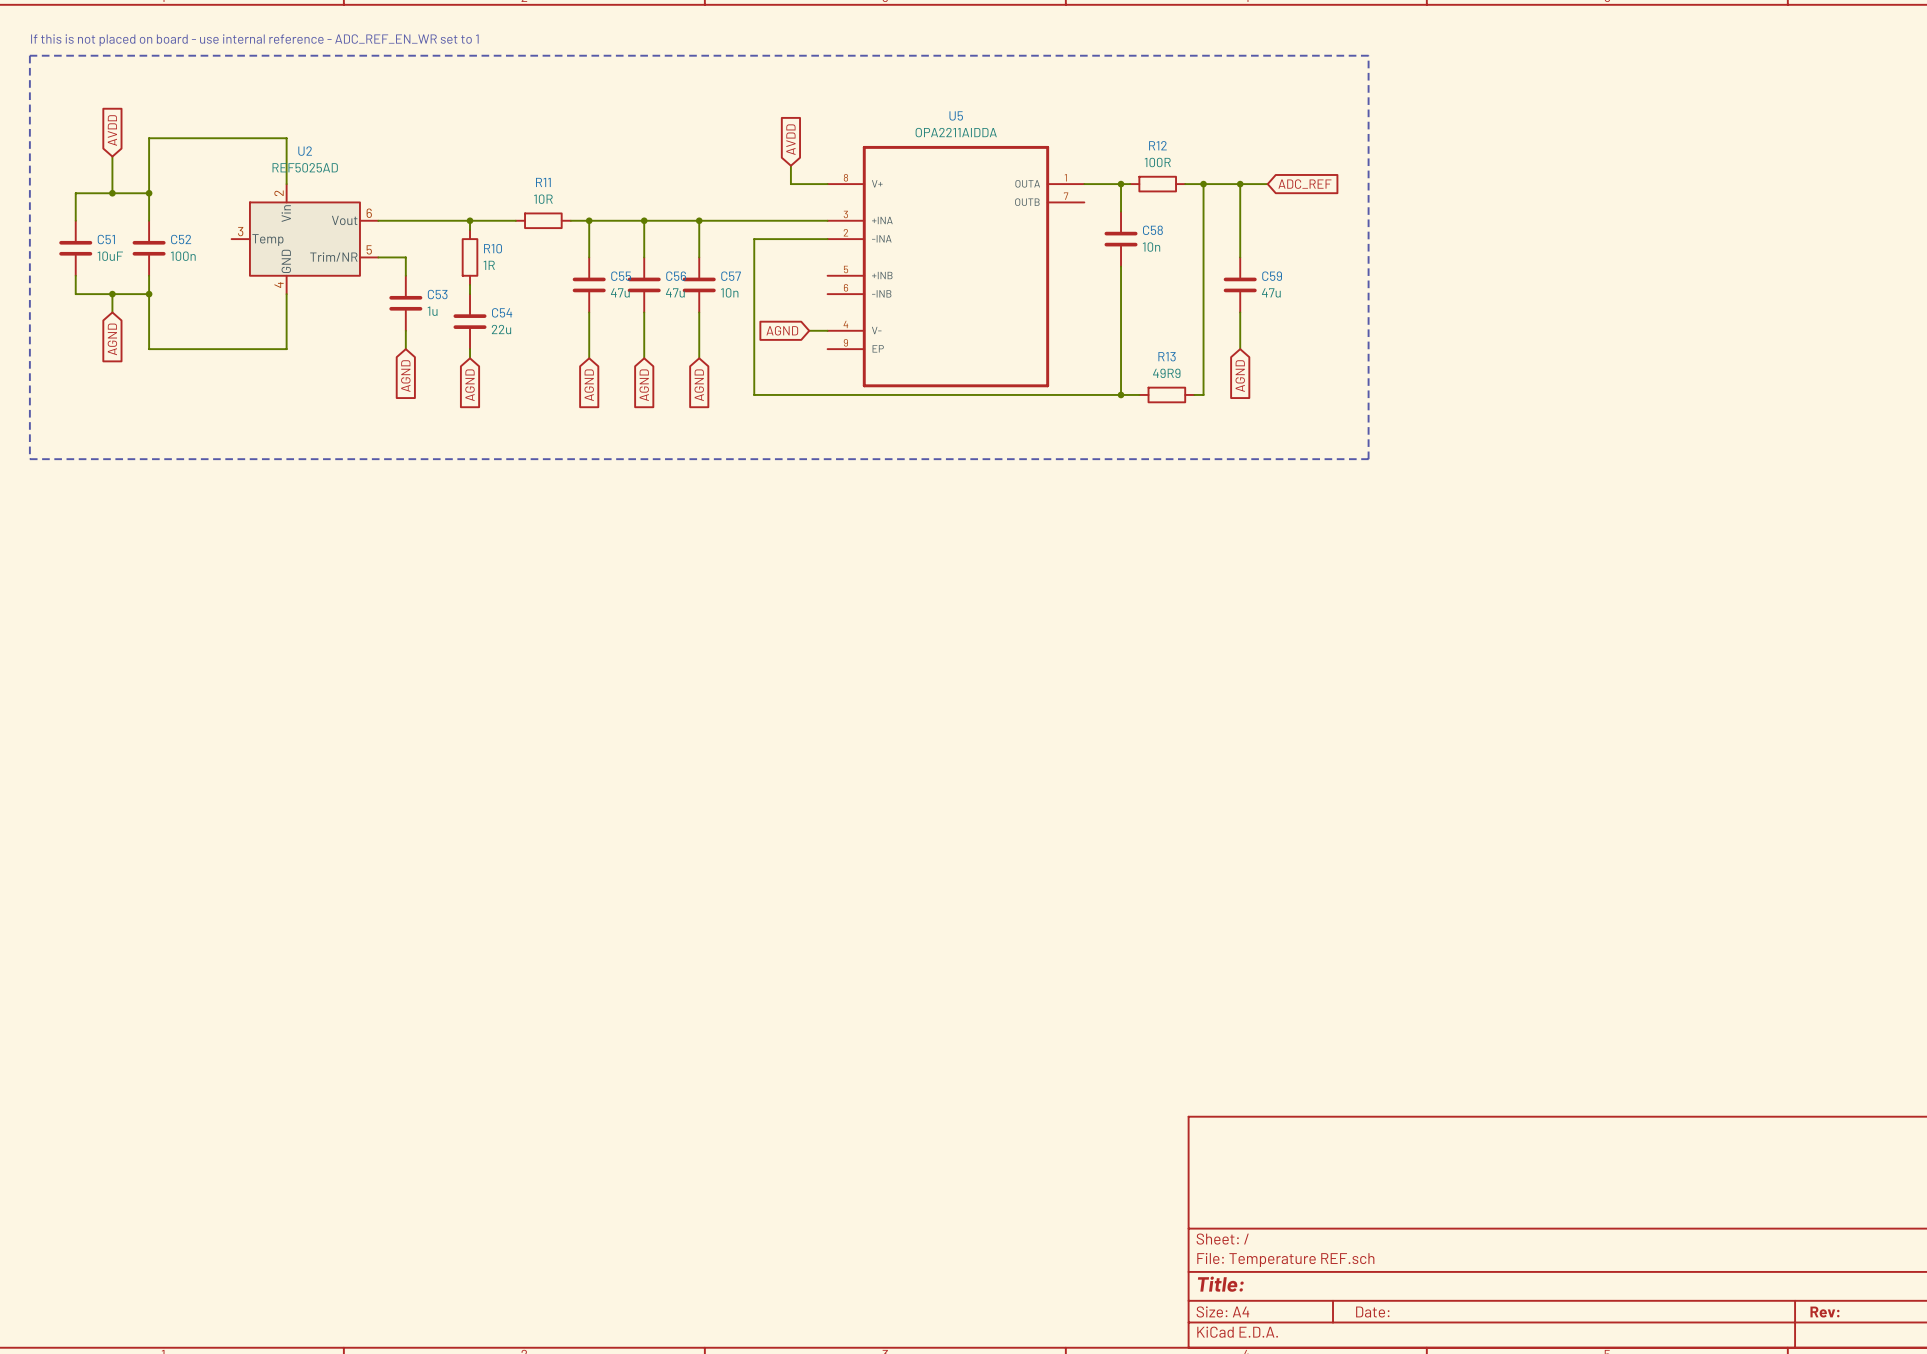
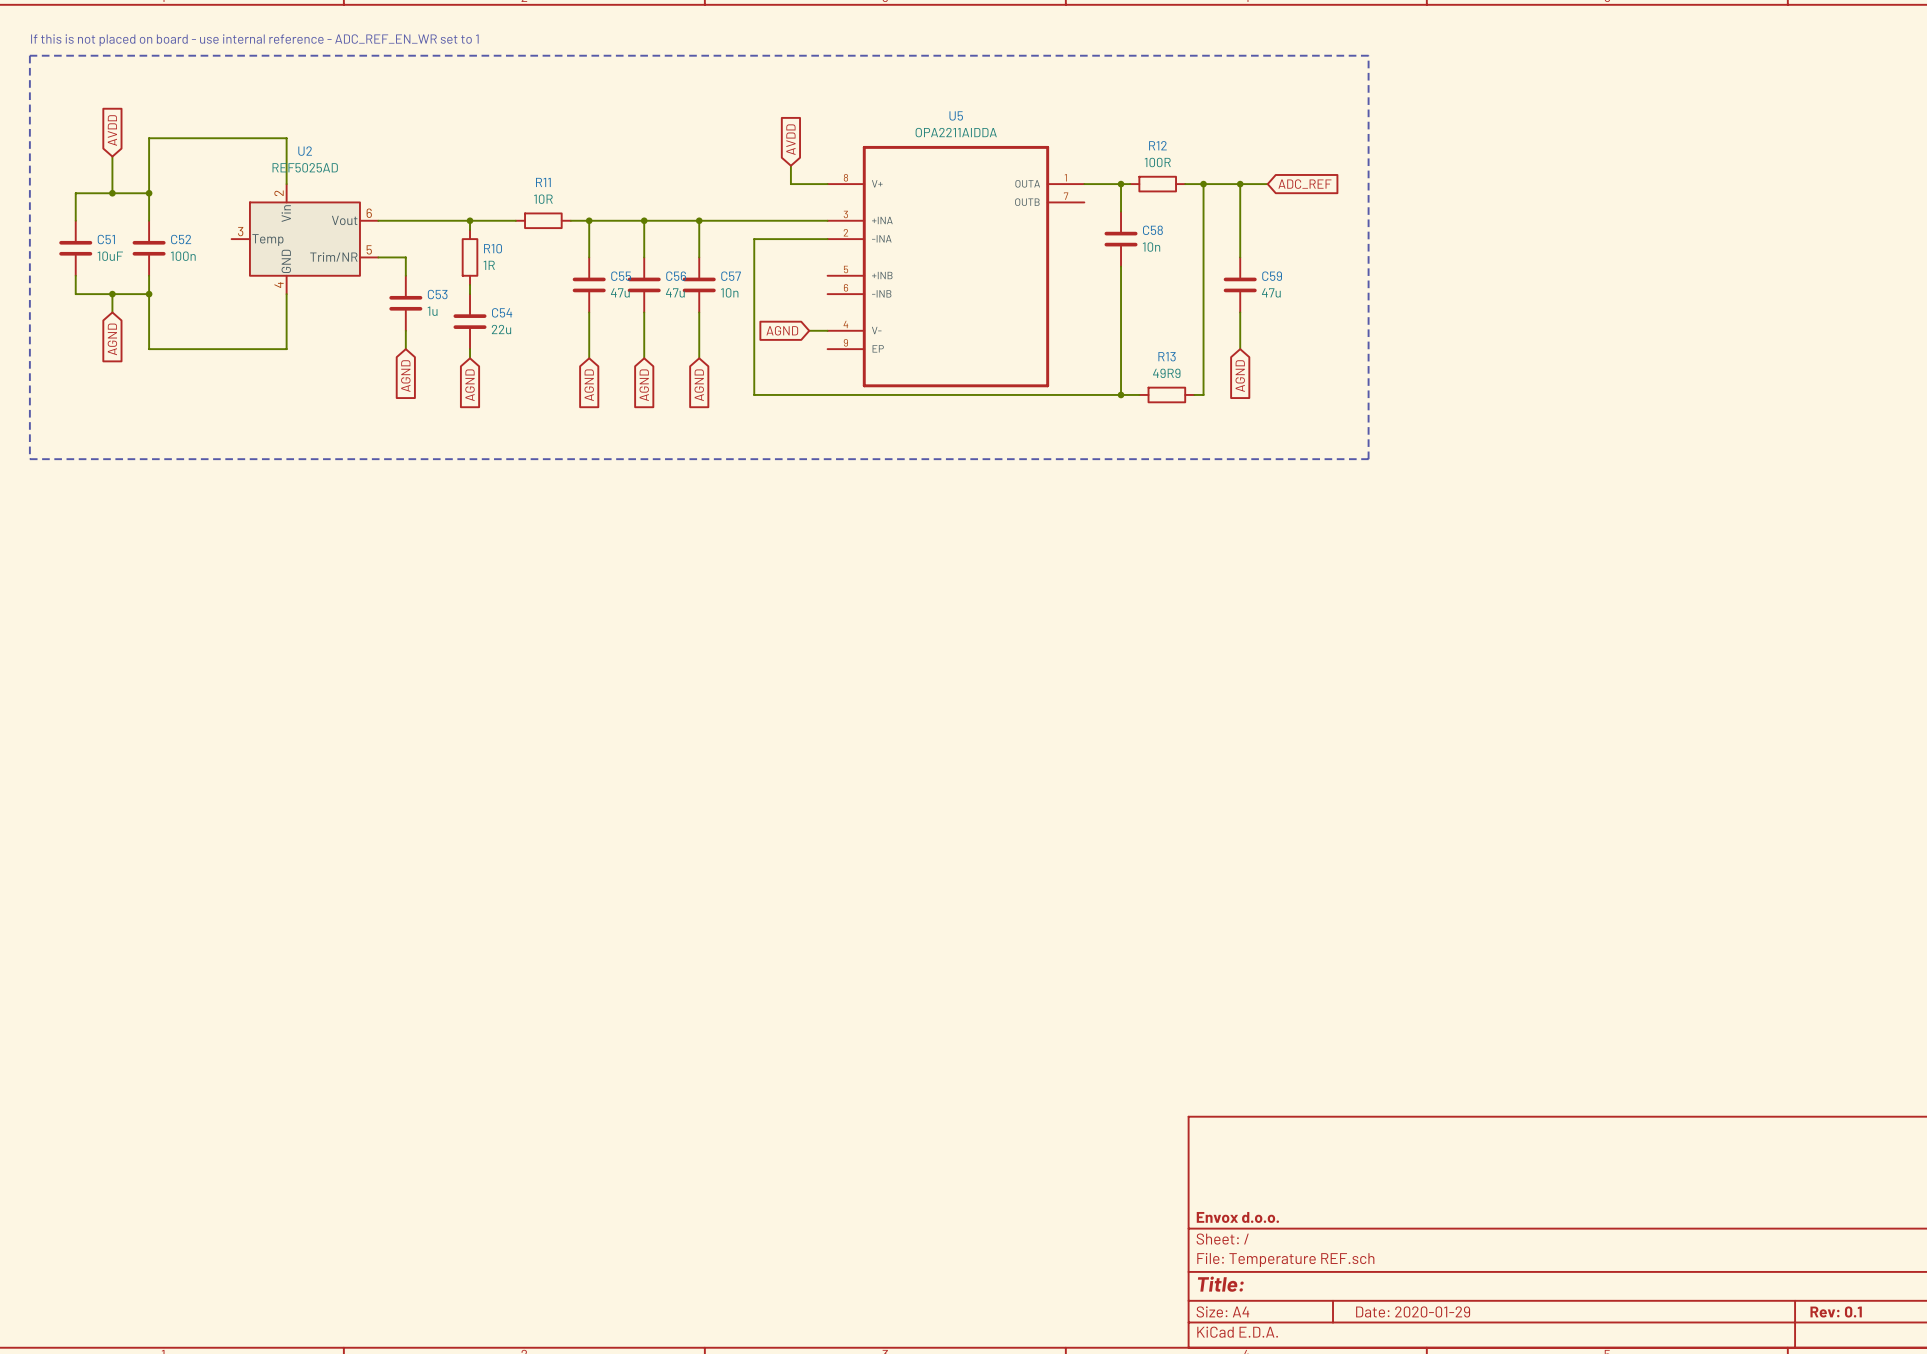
title block: none -> Envox d.o.o. (1237, 1217)
title block: Date: (1372, 1312) -> Date: 2020-01-29 (1413, 1311)
title block: Rev: (1824, 1312) -> Rev: 0.1 (1836, 1311)

